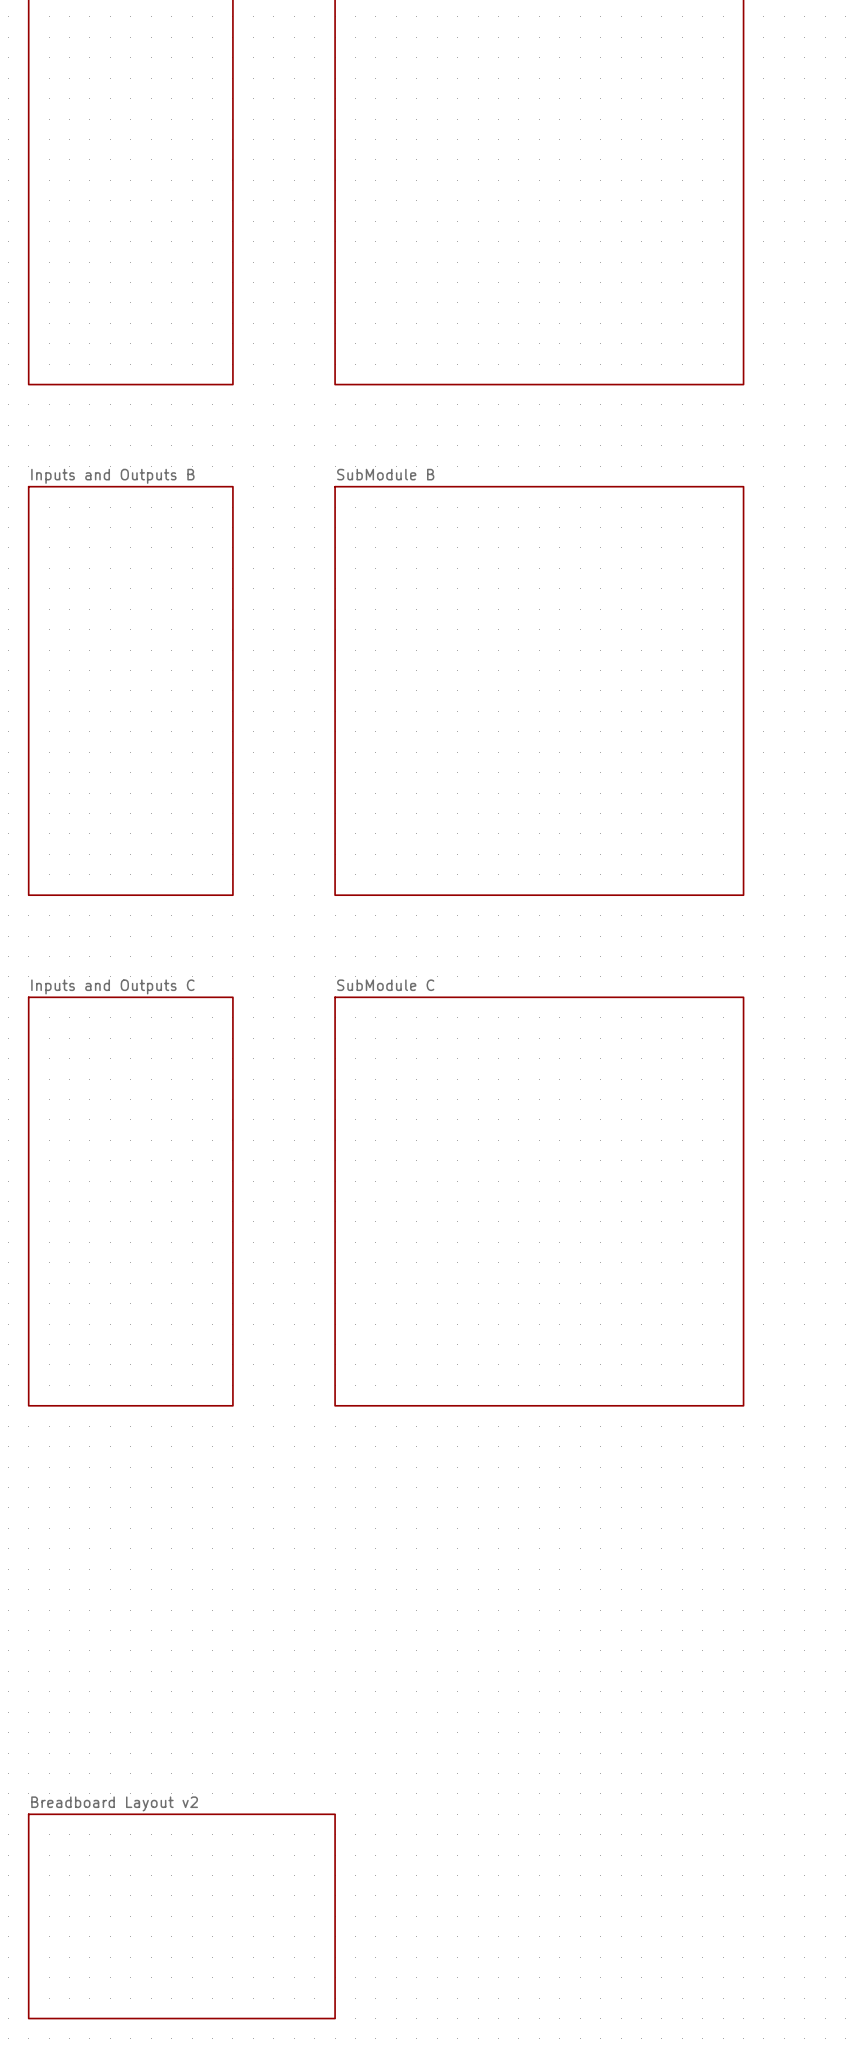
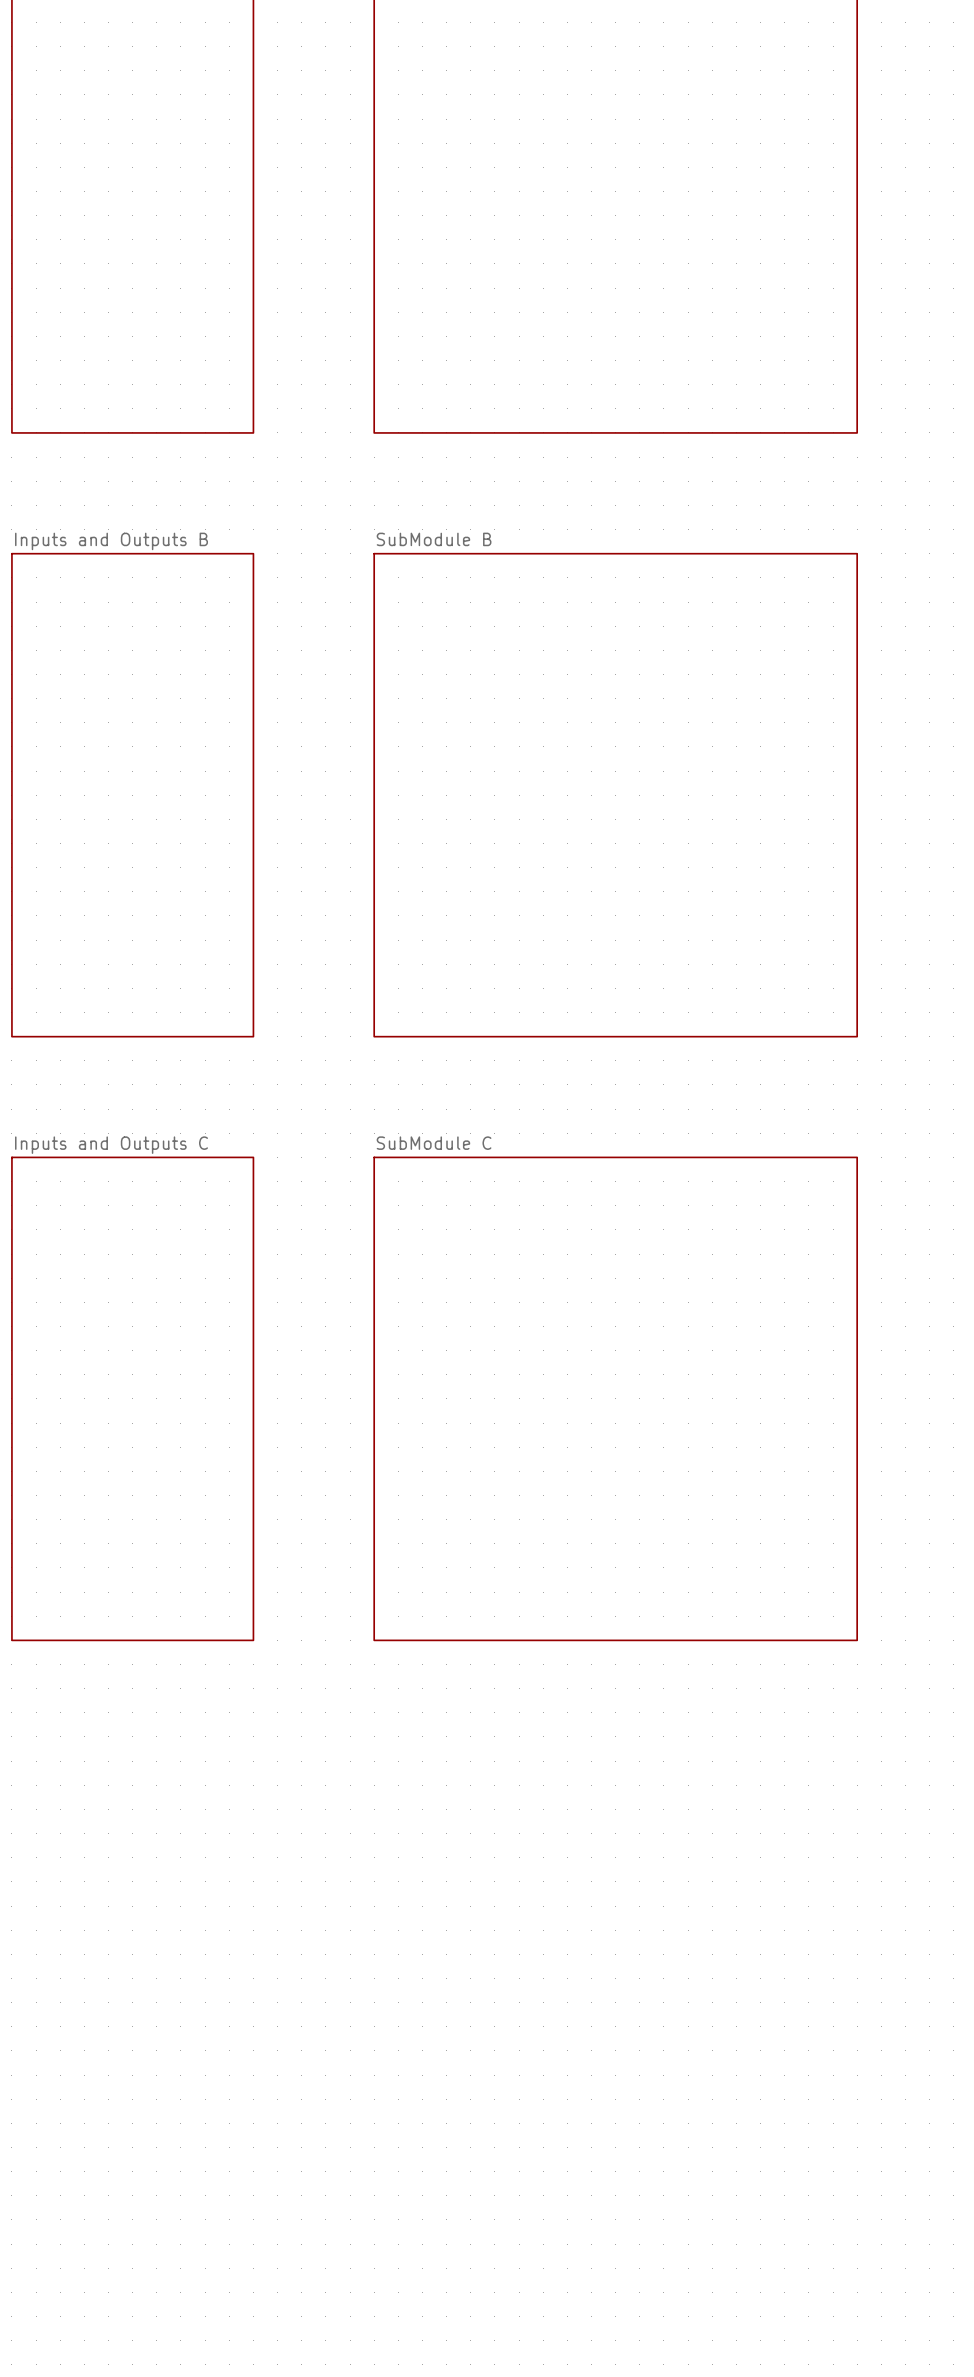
sheet Breadboard Layout v2: (181, 1916) -> none

